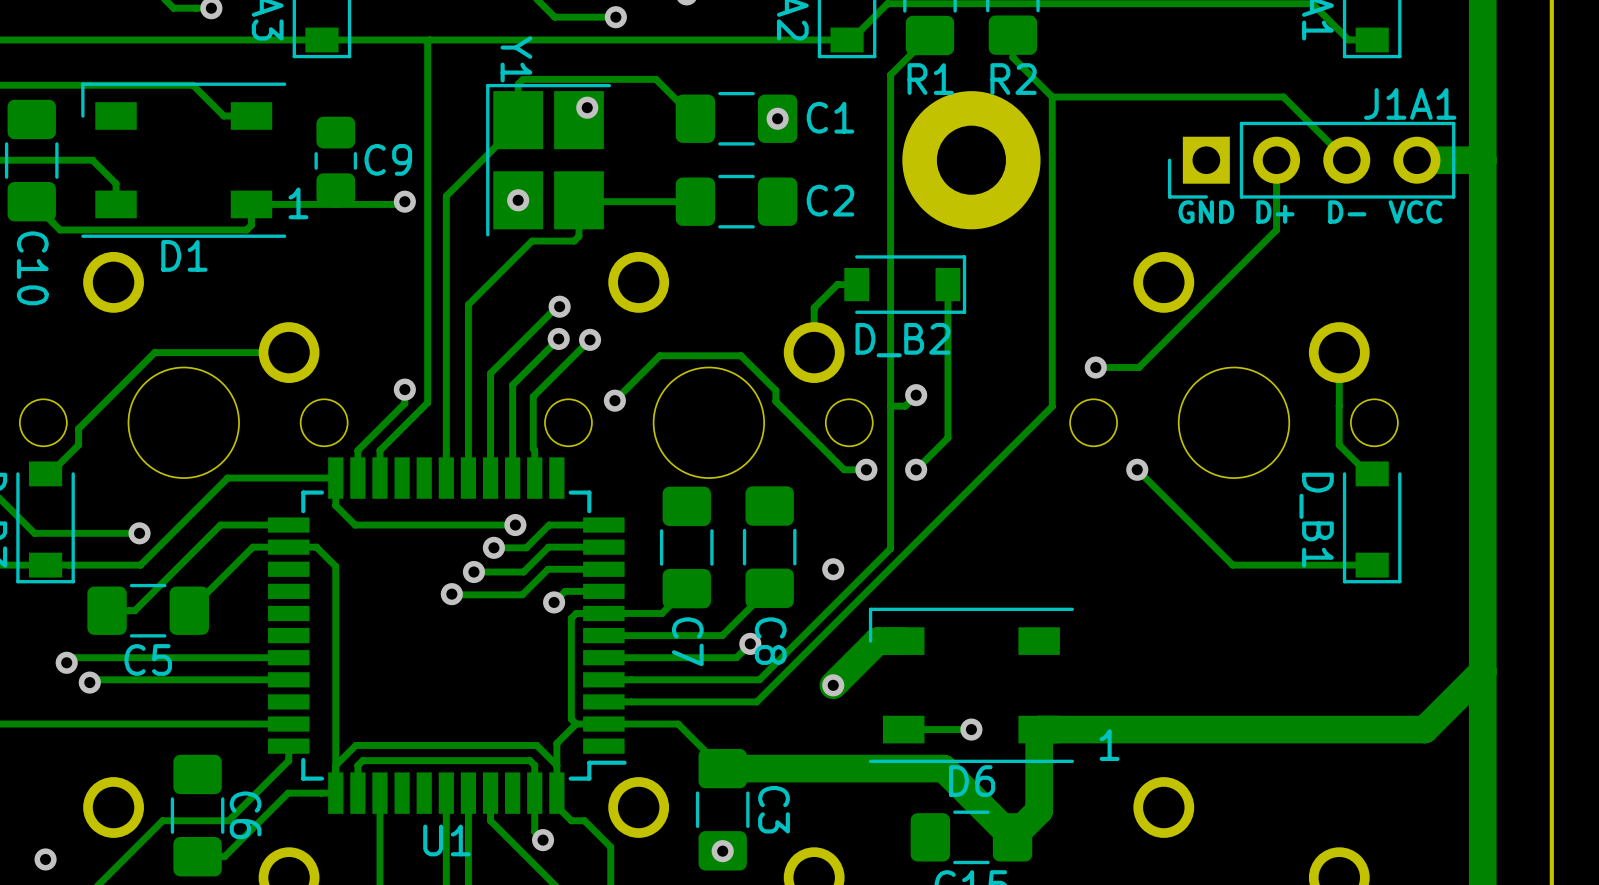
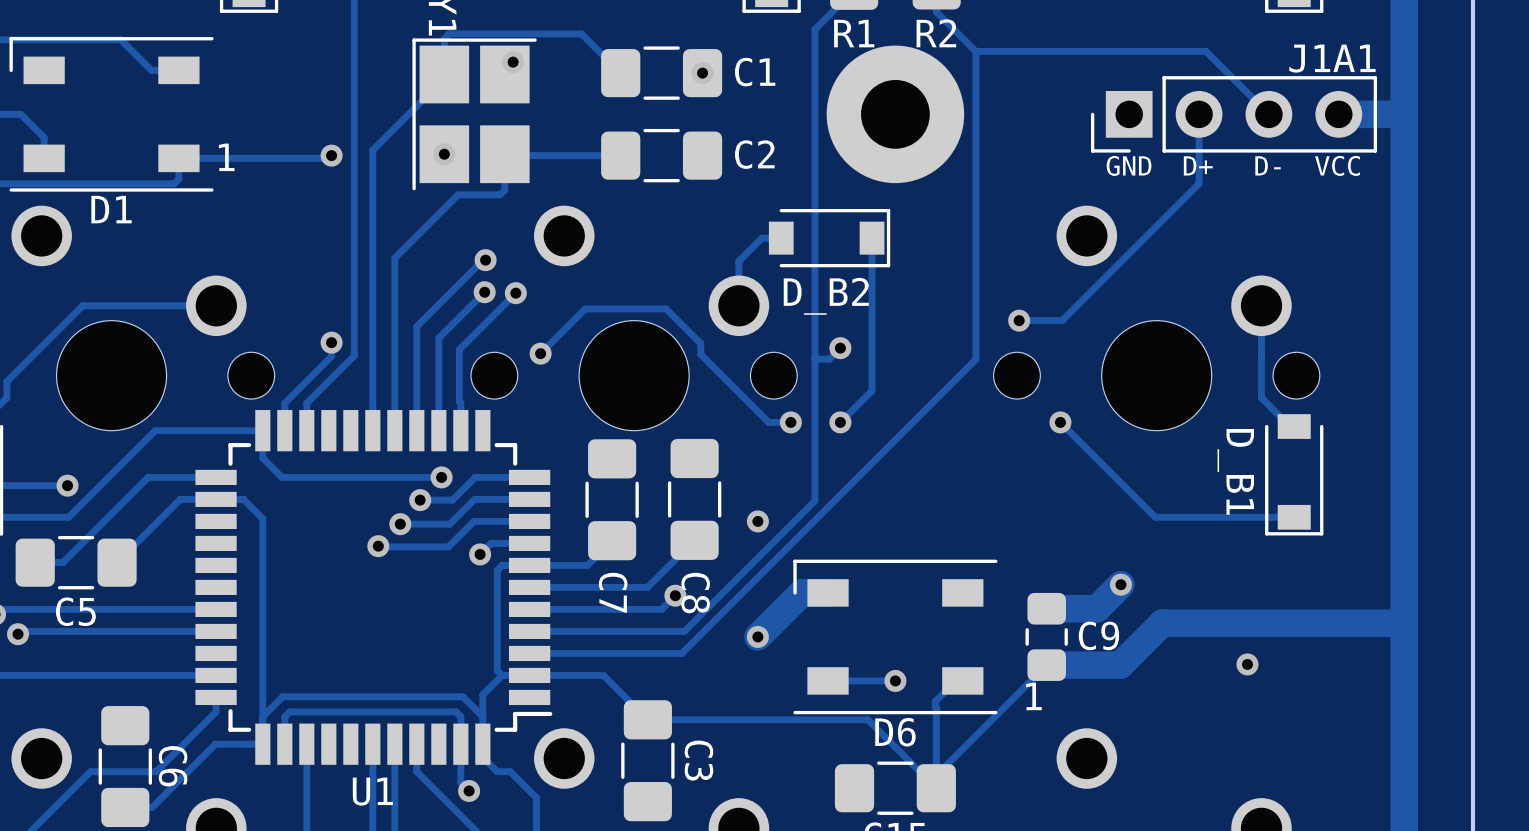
C9 position: (335, 160) -> (1046, 636)
track: none -> (1120, 584) (1096, 608) (1046, 608)
via: none -> (1120, 584)
track: (1482, 671) (1424, 729) (1039, 729) (1039, 810) (1012, 837) -> (1404, 623) (1162, 623) (1120, 665) (1046, 665) (936, 775) (935, 701) (955, 680) (962, 680)
via: none -> (1247, 664)
track width: thick (722, 768) (943, 768) (1012, 837) -> thin (647, 719) (867, 719) (936, 788)
via: (722, 851) -> none

